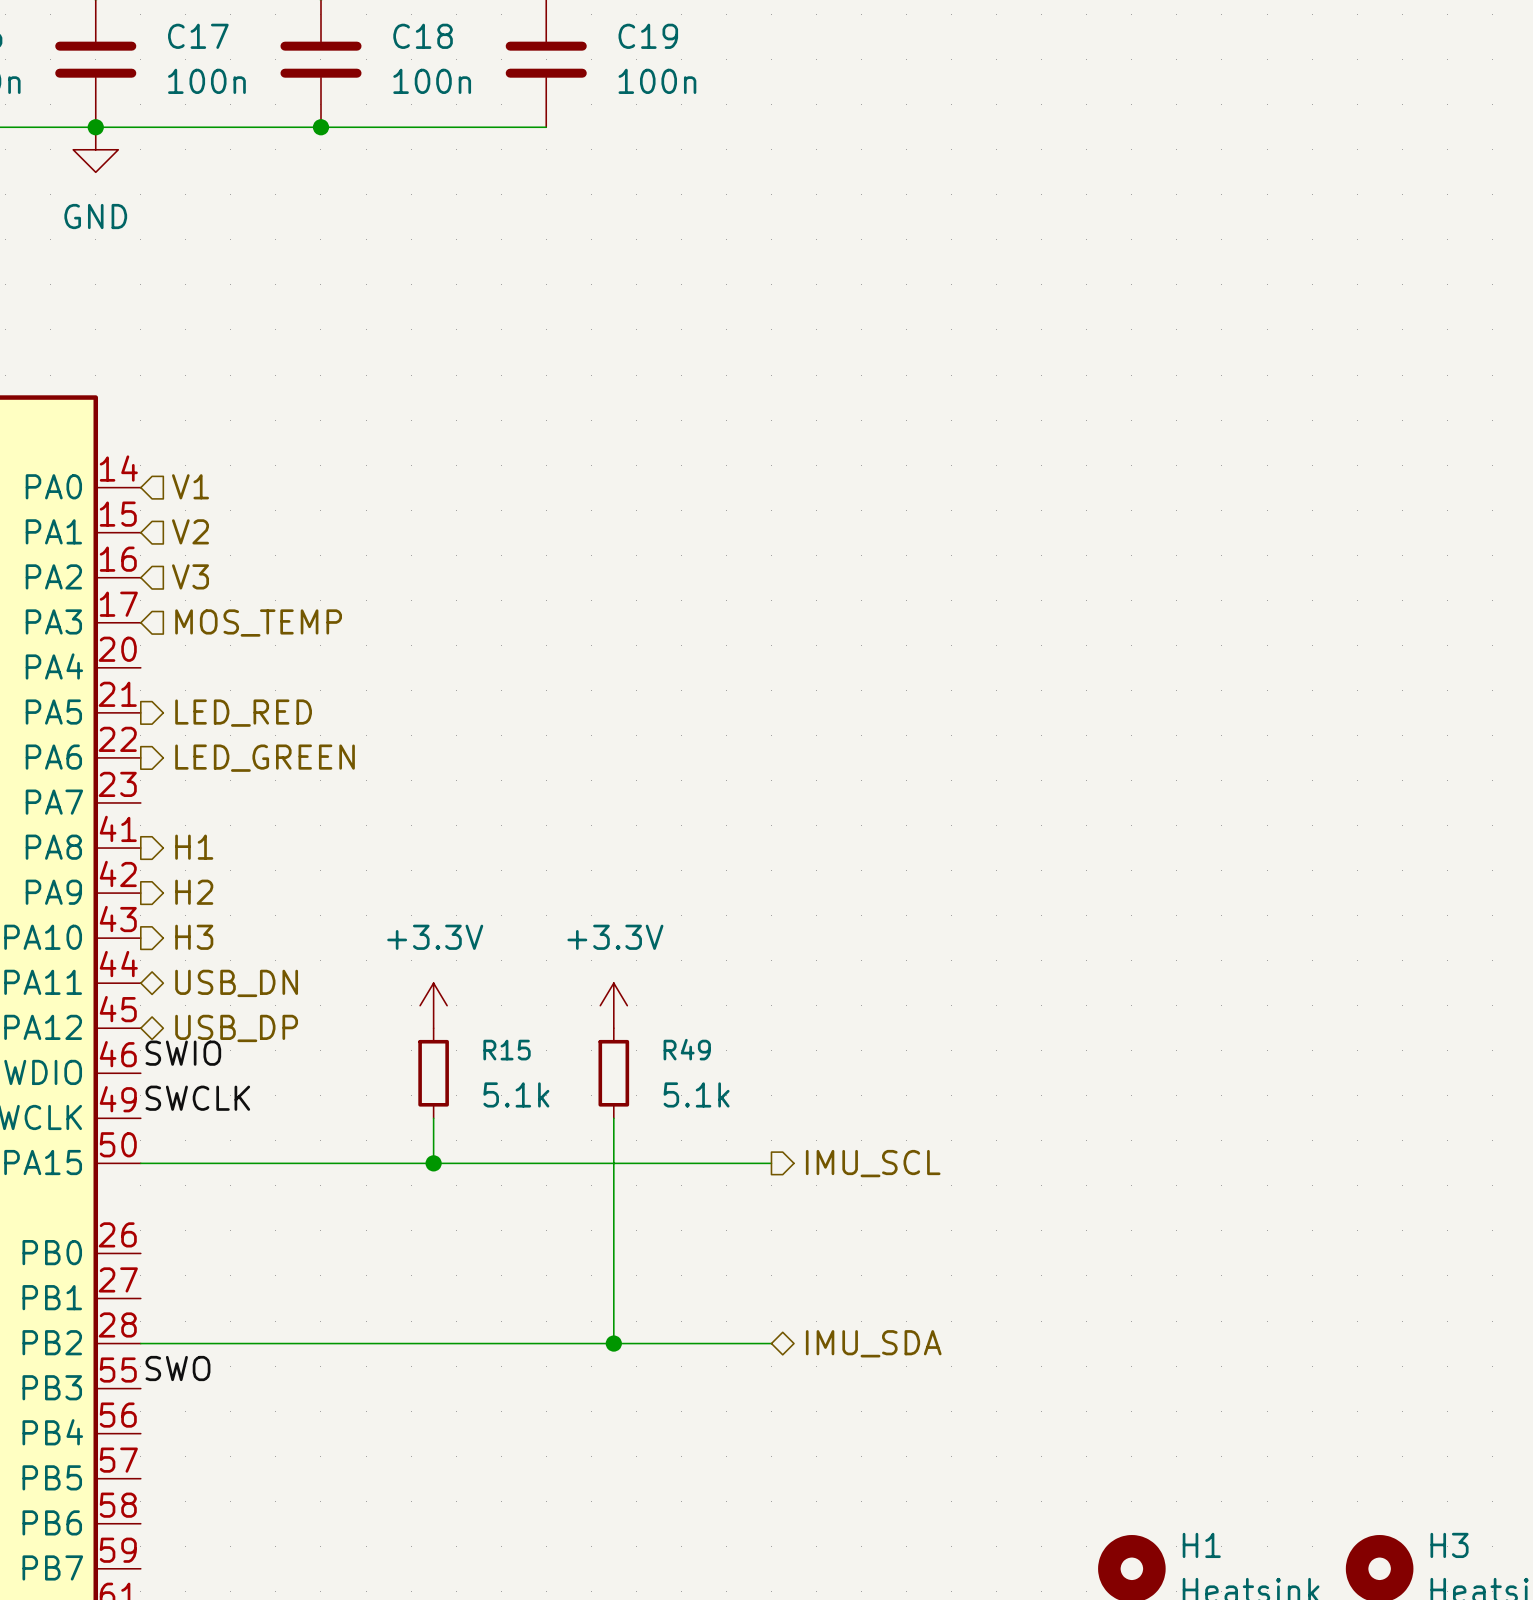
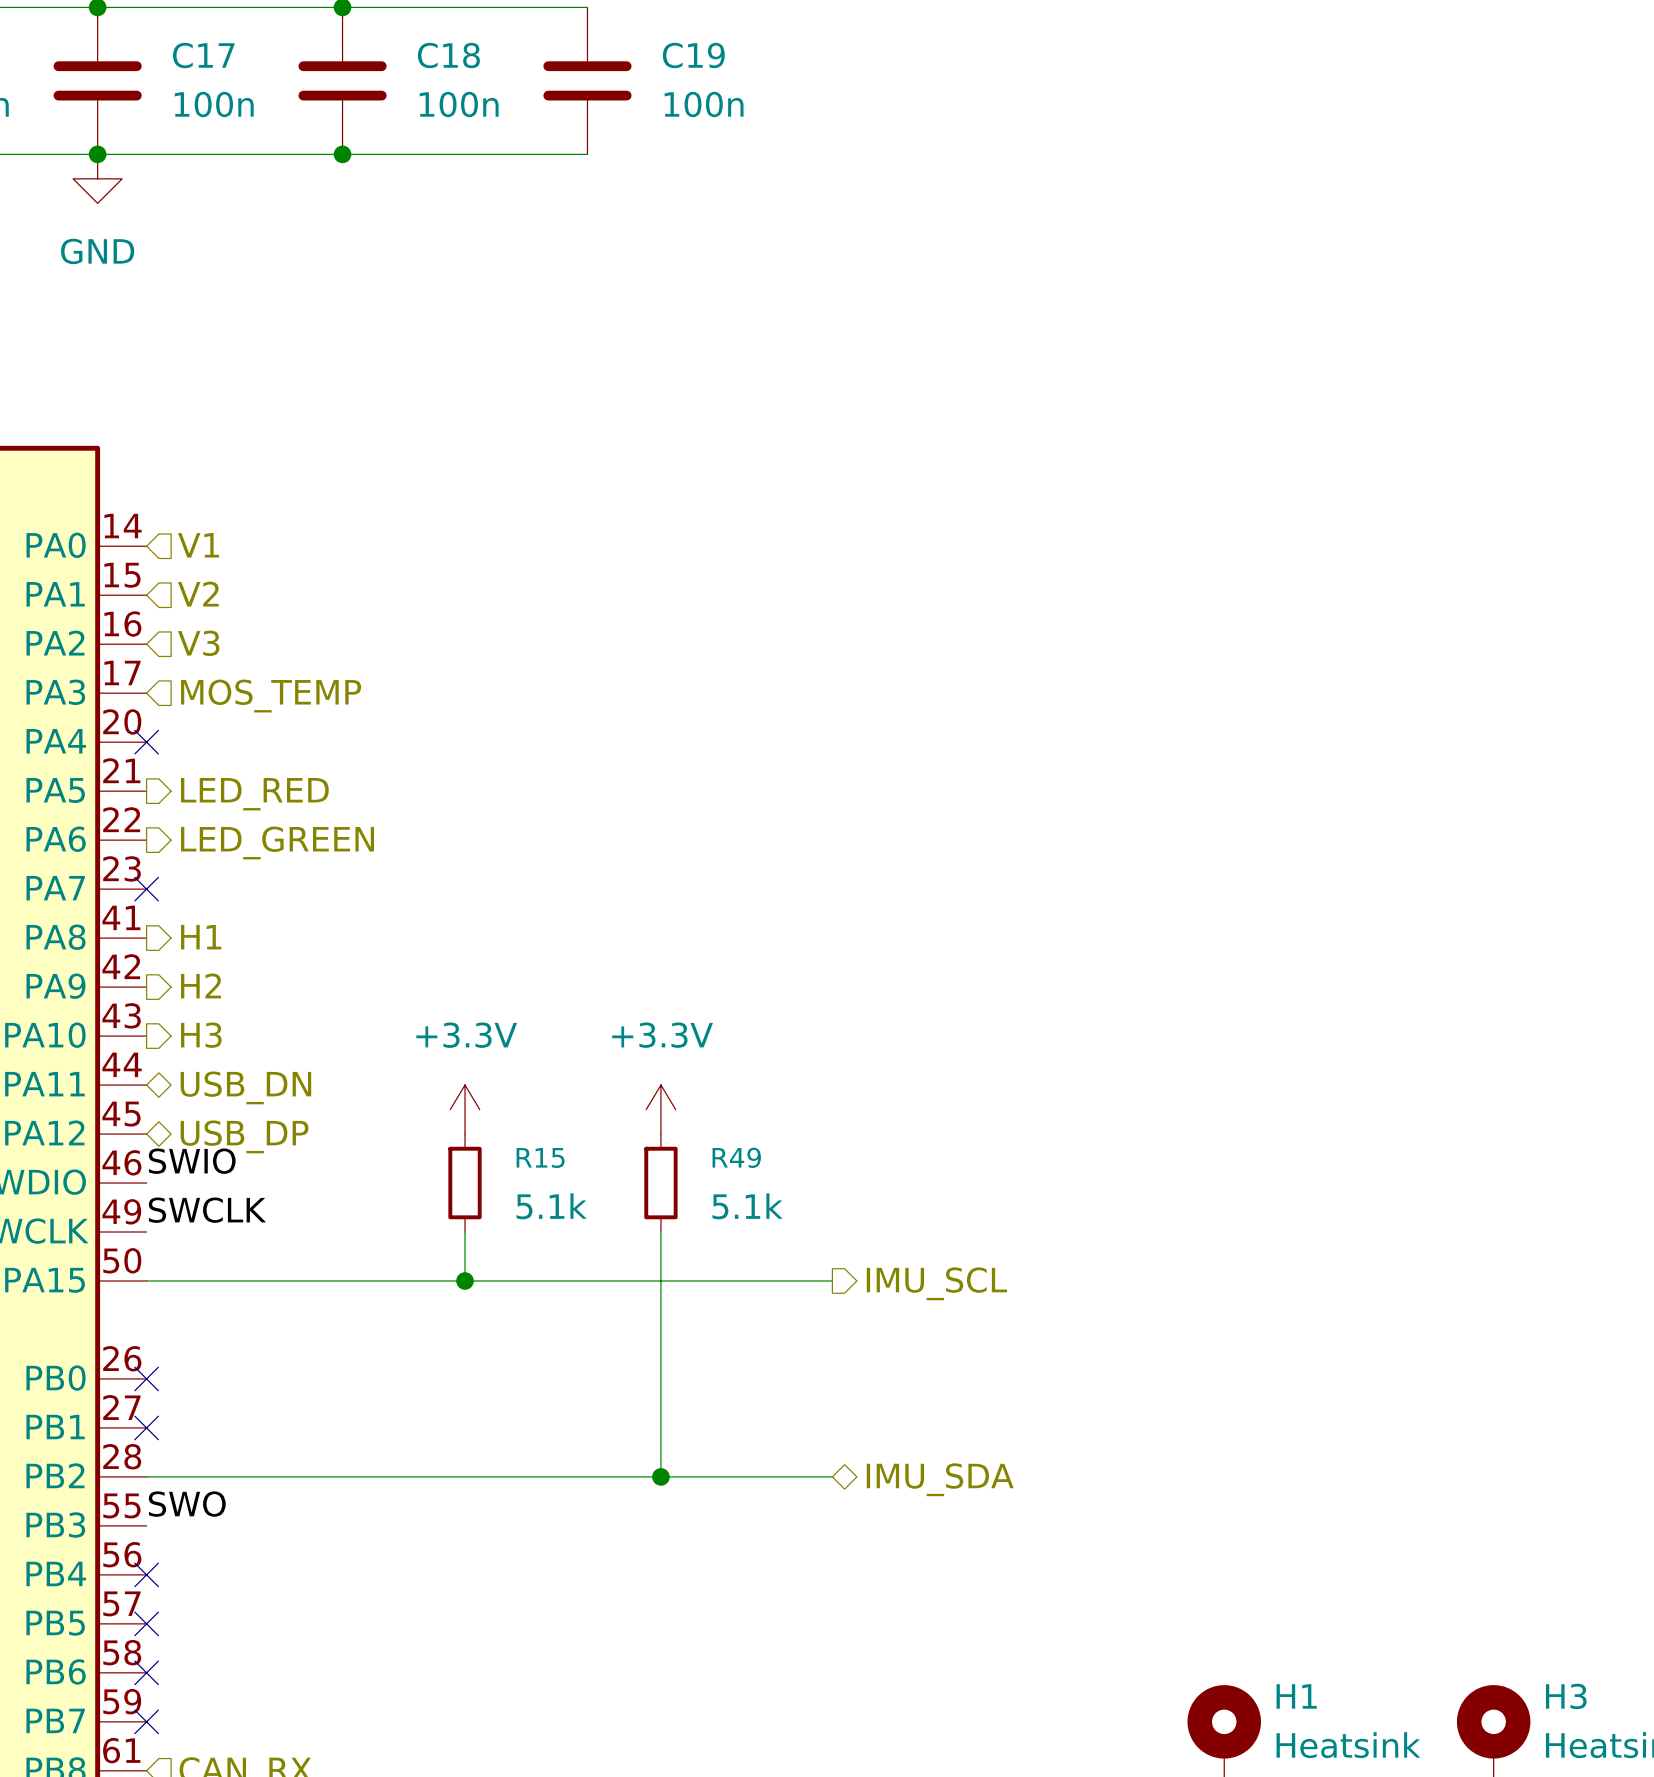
no-connect mark: none -> (146, 742)
no-connect mark: none -> (146, 889)
no-connect mark: none -> (146, 1378)
no-connect mark: none -> (146, 1427)
no-connect mark: none -> (146, 1574)
no-connect mark: none -> (146, 1623)
no-connect mark: none -> (146, 1672)
no-connect mark: none -> (146, 1721)

